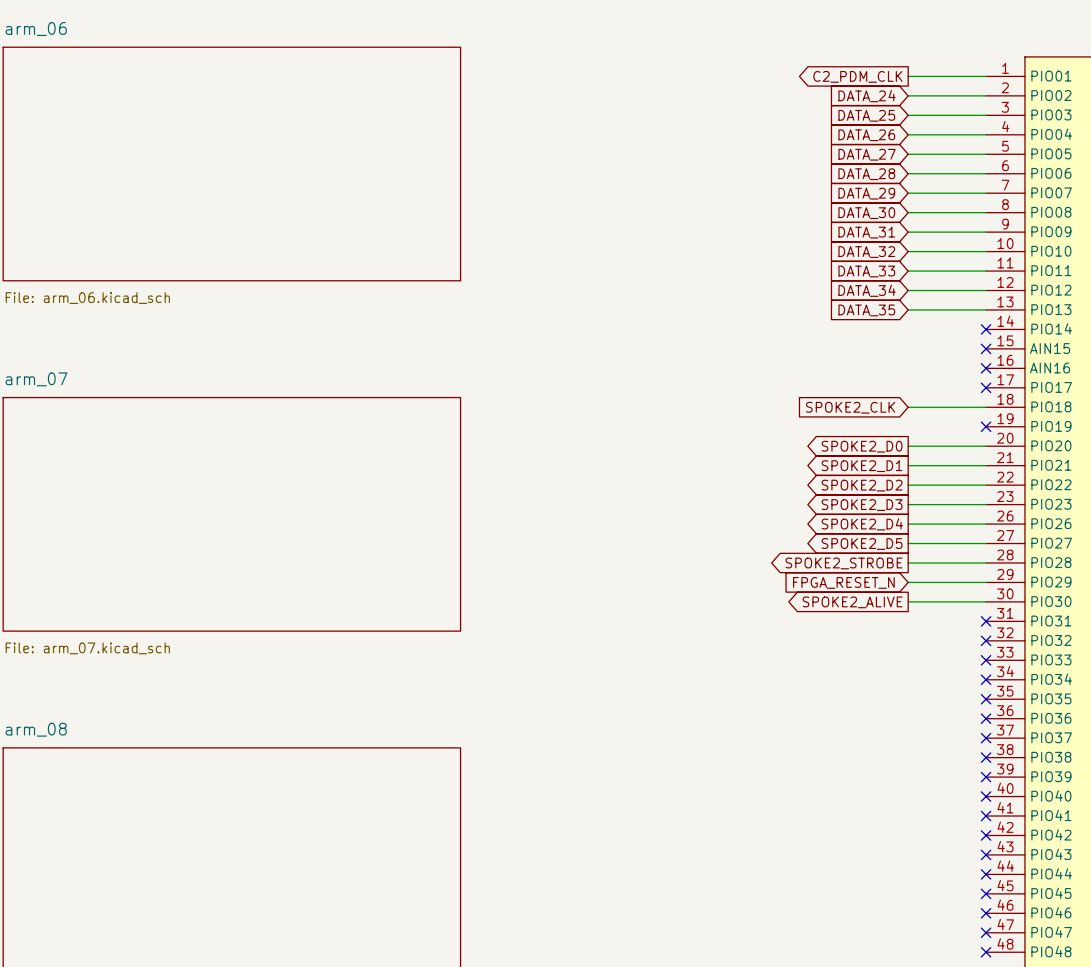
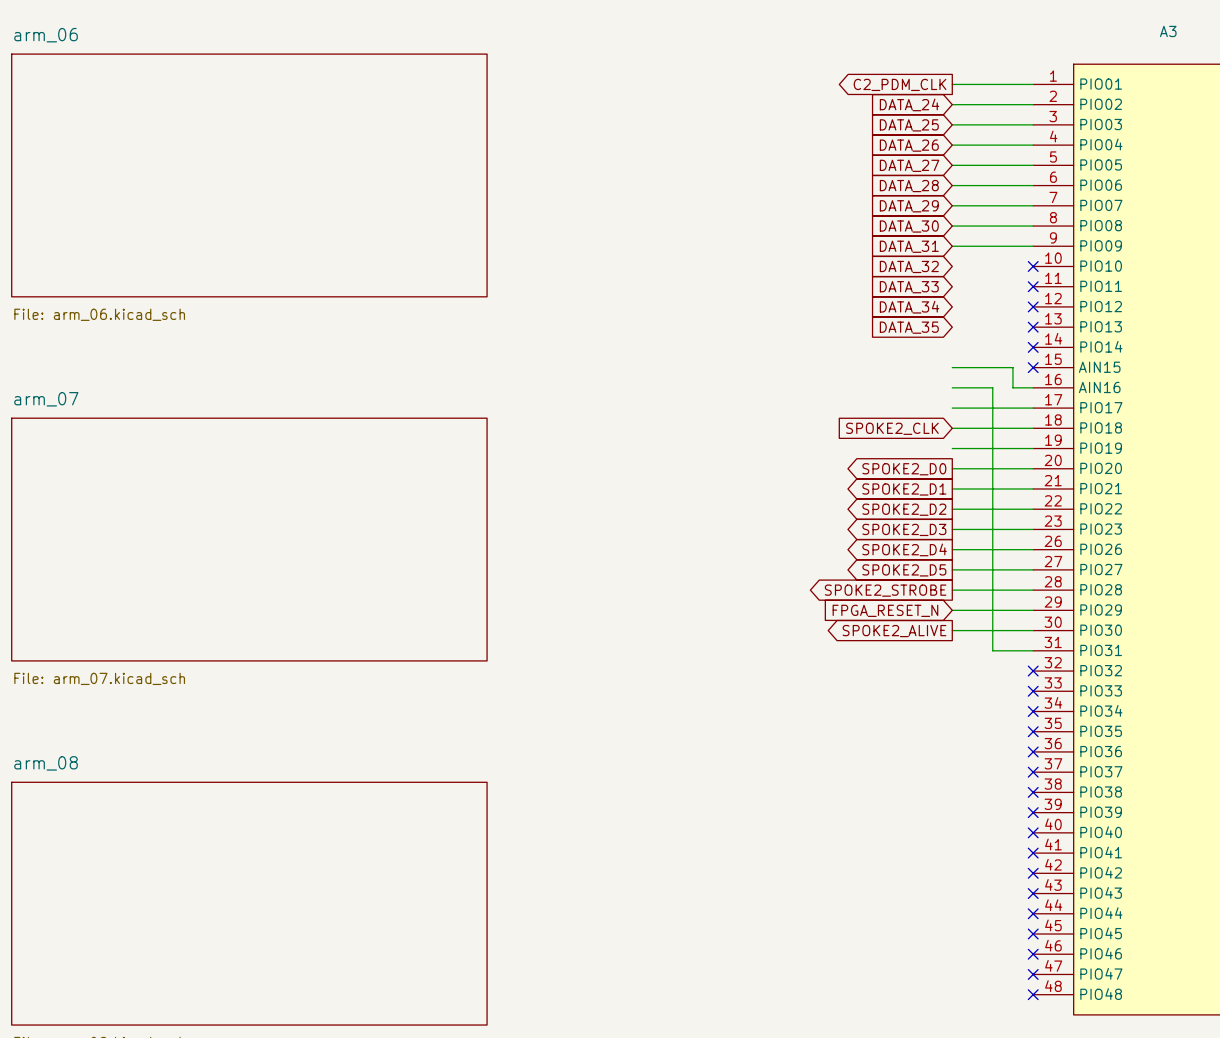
wire: (908, 251) (986, 251) -> none
no-connect mark: none -> (1033, 266)
wire: (908, 271) (986, 271) -> (952, 408) (1033, 408)
no-connect mark: none -> (1033, 286)
wire: (908, 290) (986, 290) -> none
no-connect mark: none -> (1033, 306)
wire: (908, 309) (986, 309) -> (952, 448) (1033, 448)
no-connect mark: none -> (1033, 327)
wire: none -> (952, 367) (1012, 367) (1012, 387) (1033, 387)
wire: none -> (952, 387) (992, 387) (992, 650) (1033, 650)
no-connect mark: (986, 368) -> none
no-connect mark: (986, 387) -> none
no-connect mark: (986, 426) -> none
no-connect mark: (986, 621) -> none

